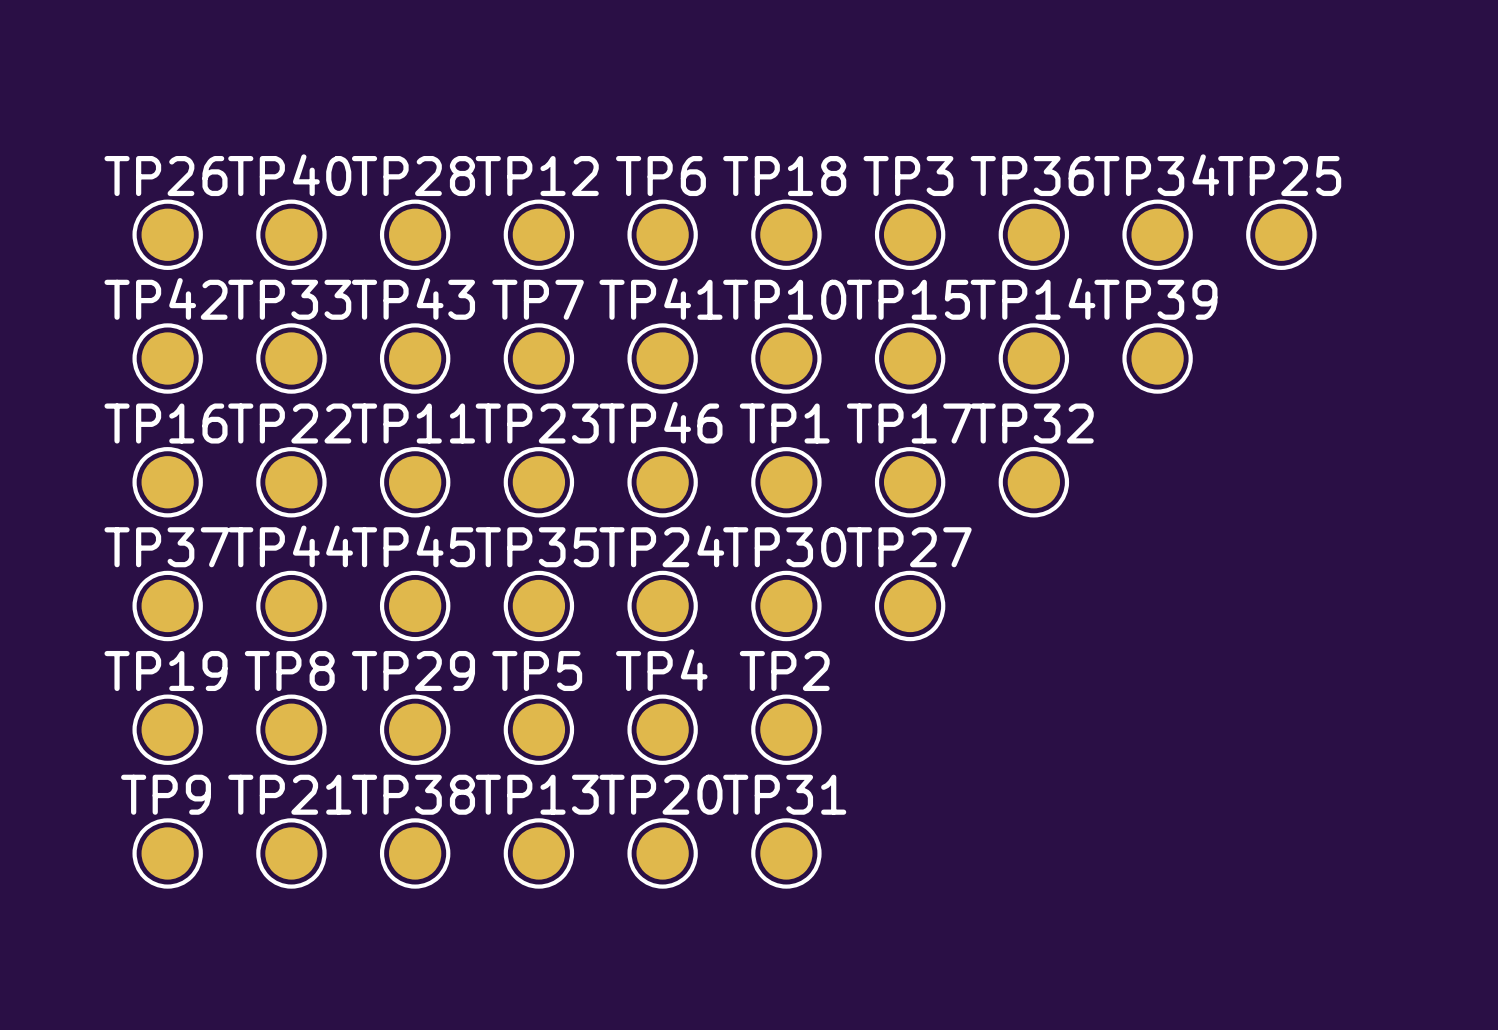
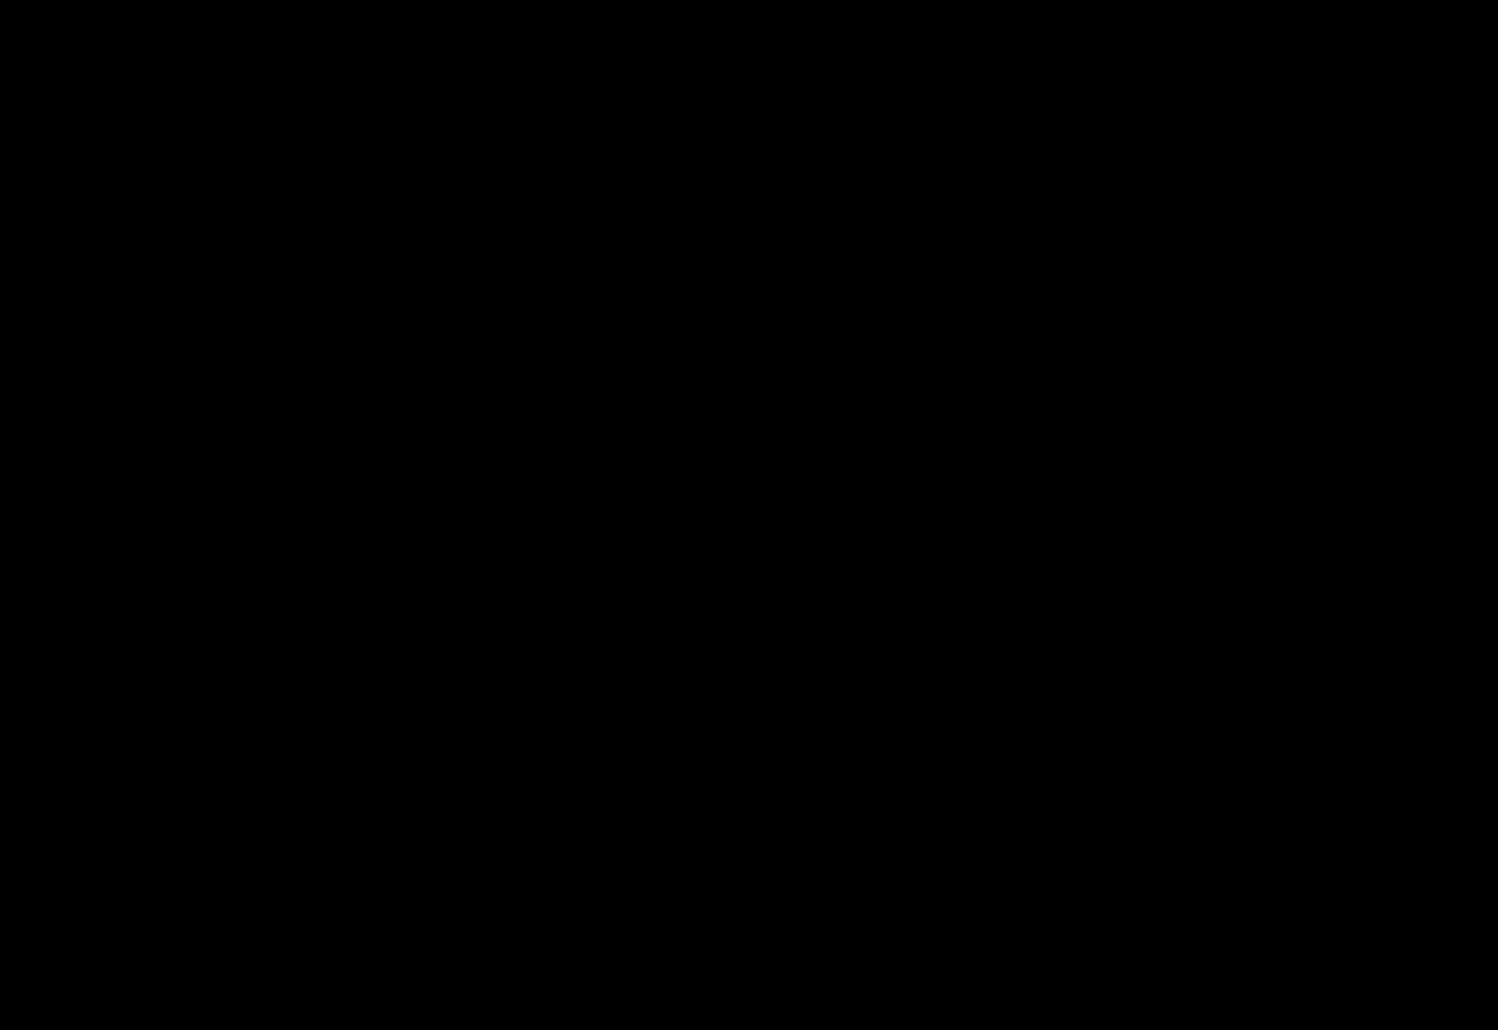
TP26: (167, 234) -> none
TP40: (291, 234) -> none
TP28: (415, 234) -> none
TP12: (538, 234) -> none
TP6: (662, 234) -> none
TP18: (786, 234) -> none
TP3: (910, 234) -> none
TP36: (1033, 234) -> none
TP34: (1157, 234) -> none
TP25: (1281, 234) -> none
TP42: (167, 358) -> none
TP33: (291, 358) -> none
TP43: (415, 358) -> none
TP7: (538, 358) -> none
TP41: (662, 358) -> none
TP10: (786, 358) -> none
TP15: (910, 358) -> none
TP14: (1033, 358) -> none
TP39: (1157, 358) -> none
TP16: (167, 482) -> none
TP22: (291, 482) -> none
TP11: (415, 482) -> none
TP23: (538, 482) -> none
TP46: (662, 482) -> none
TP1: (786, 482) -> none
TP17: (910, 482) -> none
TP32: (1033, 482) -> none
TP37: (167, 605) -> none
TP44: (291, 605) -> none
TP45: (415, 605) -> none
TP35: (538, 605) -> none
TP24: (662, 605) -> none
TP30: (786, 605) -> none
TP27: (910, 605) -> none
TP19: (167, 729) -> none
TP8: (291, 729) -> none
TP29: (415, 729) -> none
TP5: (538, 729) -> none
TP4: (662, 729) -> none
TP2: (786, 729) -> none
TP9: (167, 853) -> none
TP21: (291, 853) -> none
TP38: (415, 853) -> none
TP13: (538, 853) -> none
TP20: (662, 853) -> none
TP31: (786, 853) -> none

